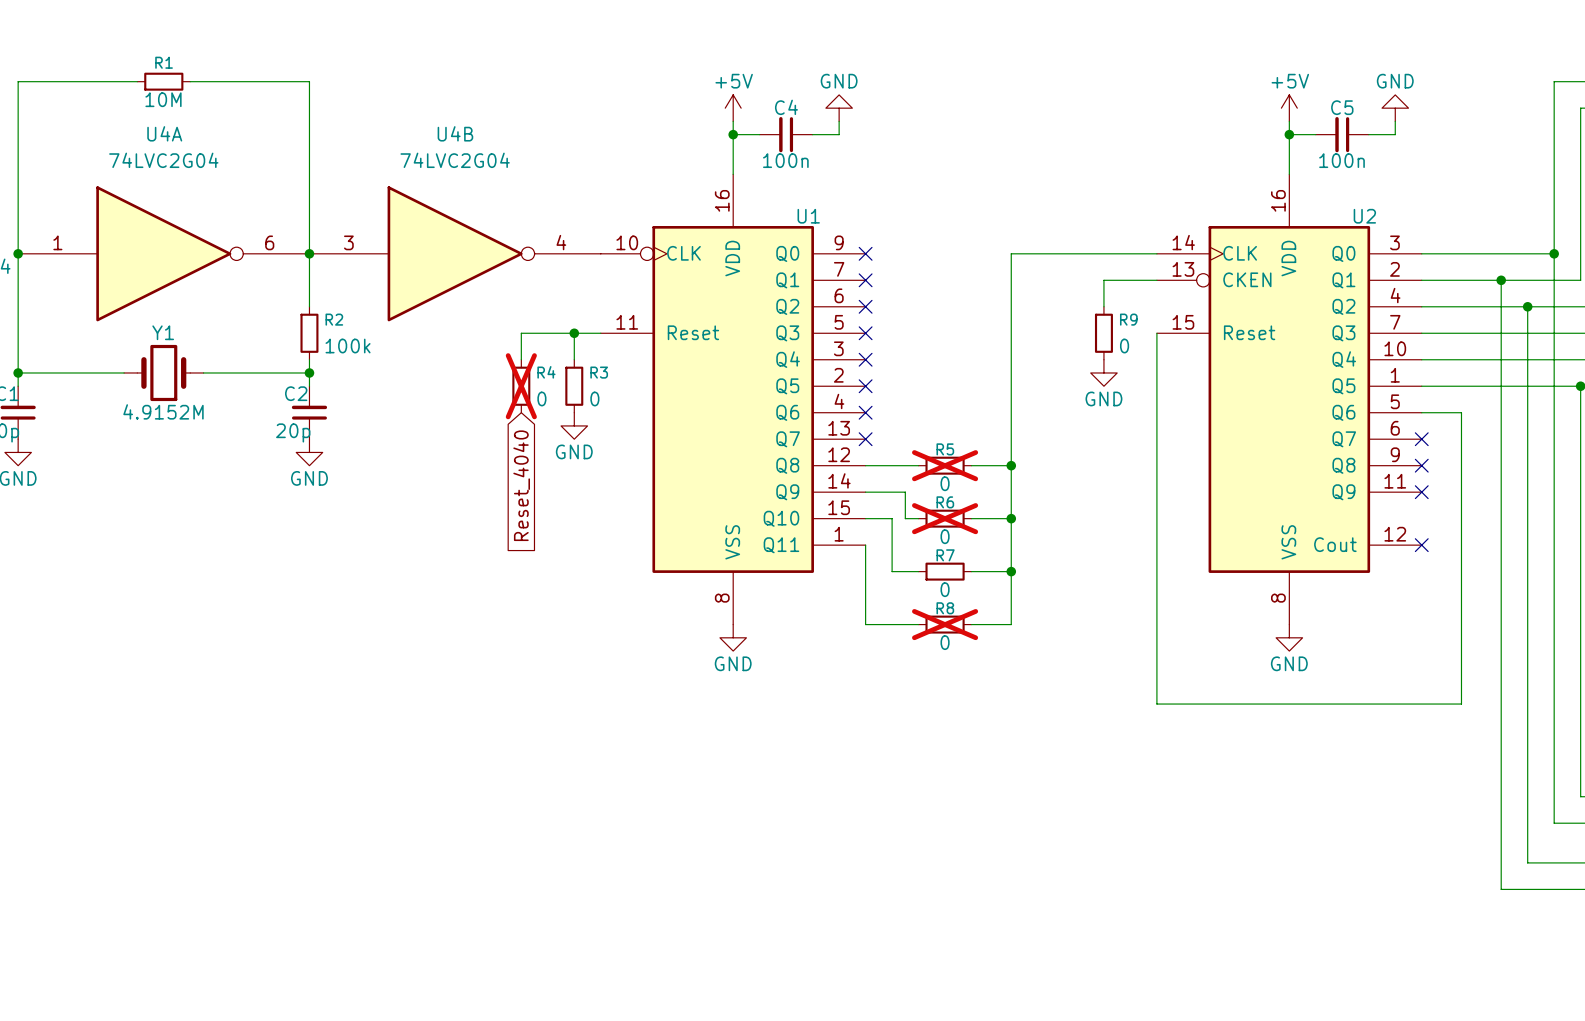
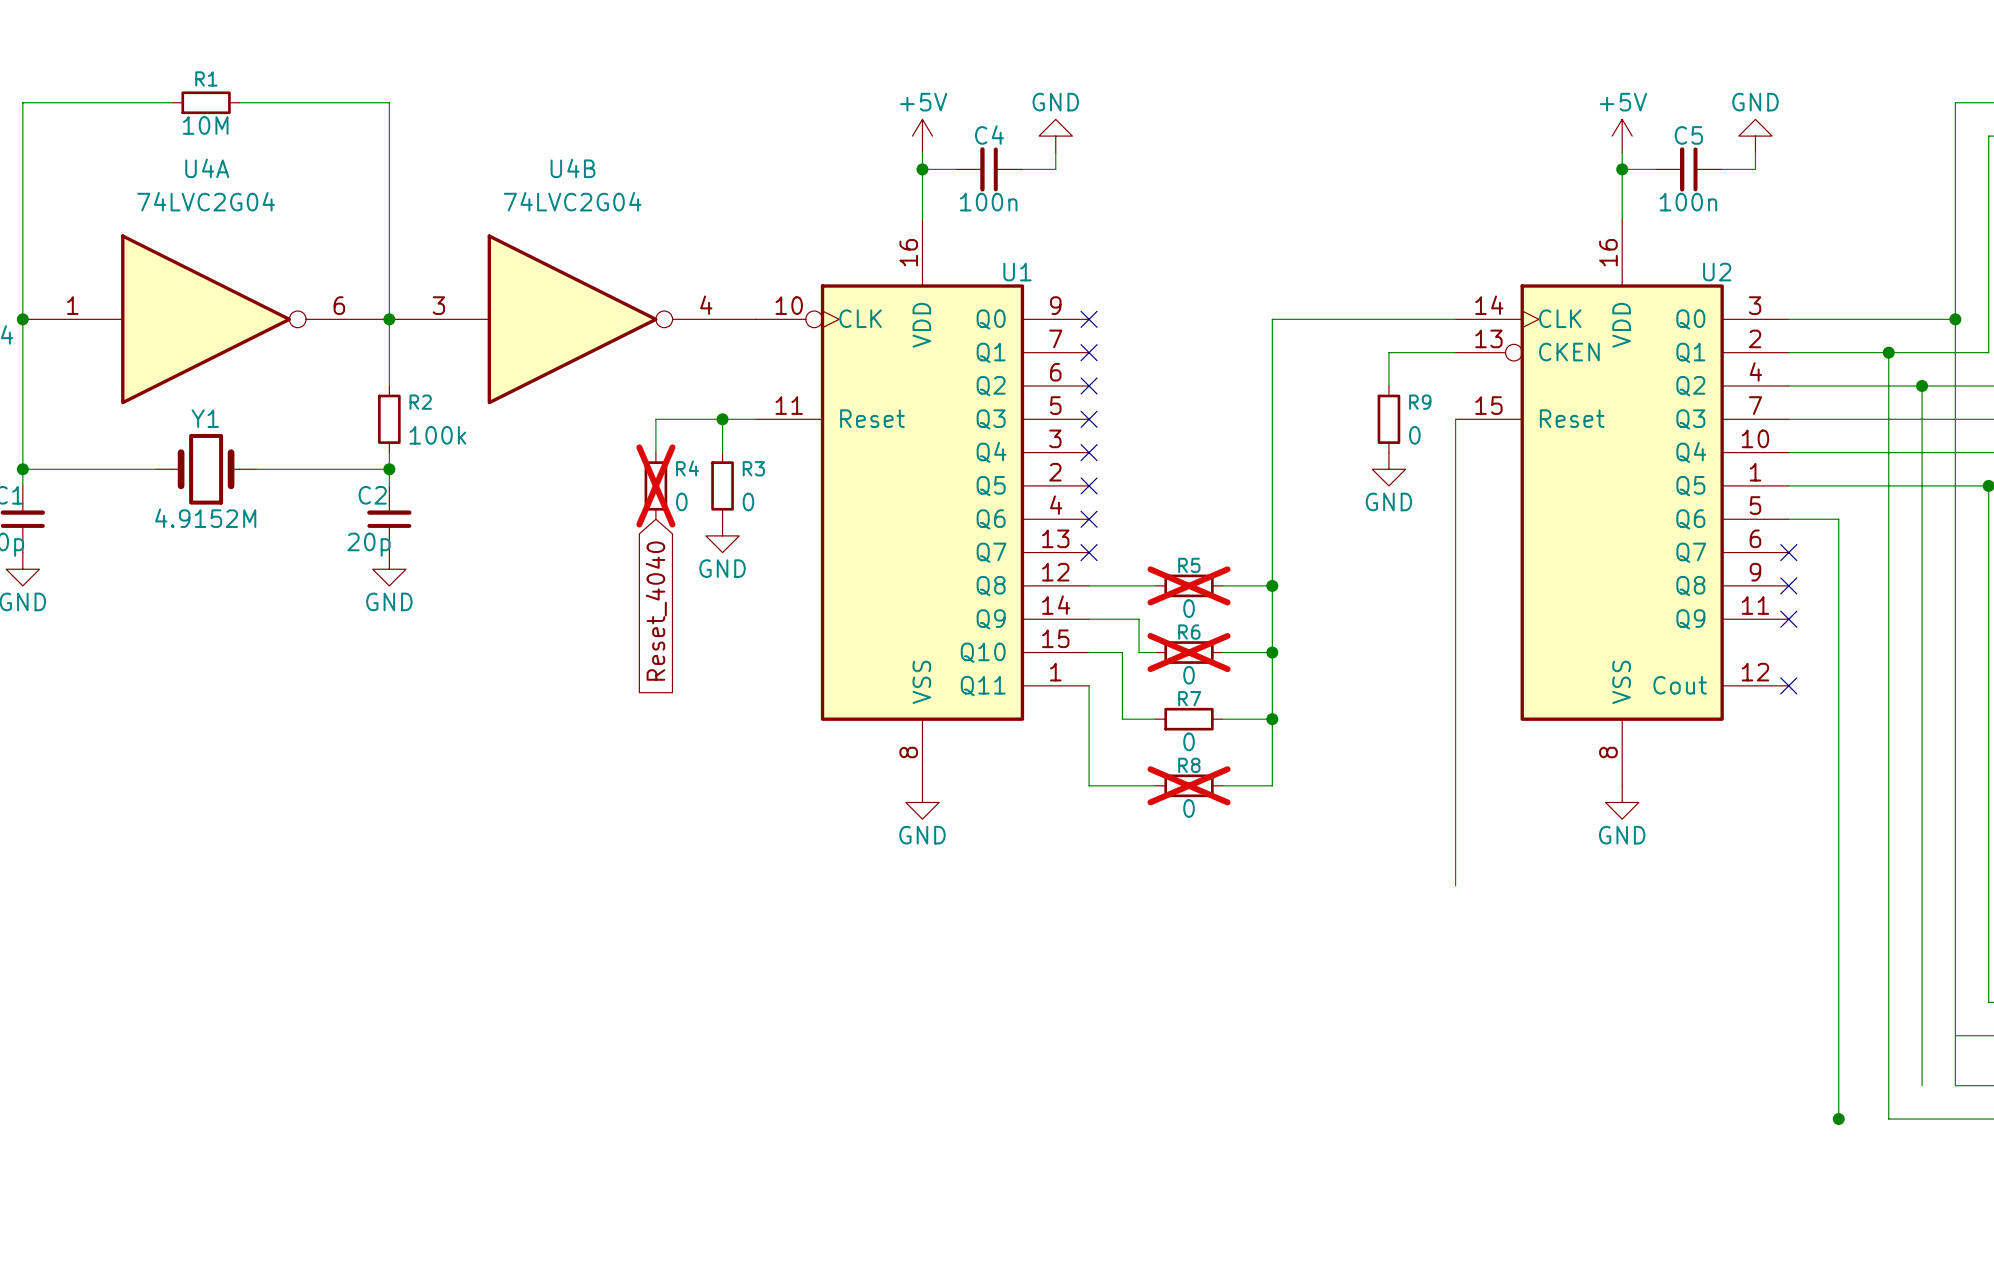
wire: (1156, 704) (1461, 704) -> (1838, 1119) (1838, 885)
wire: (1527, 862) (1554, 862) -> (1955, 1035) (1955, 1085)
junction: none -> (1838, 1119)

